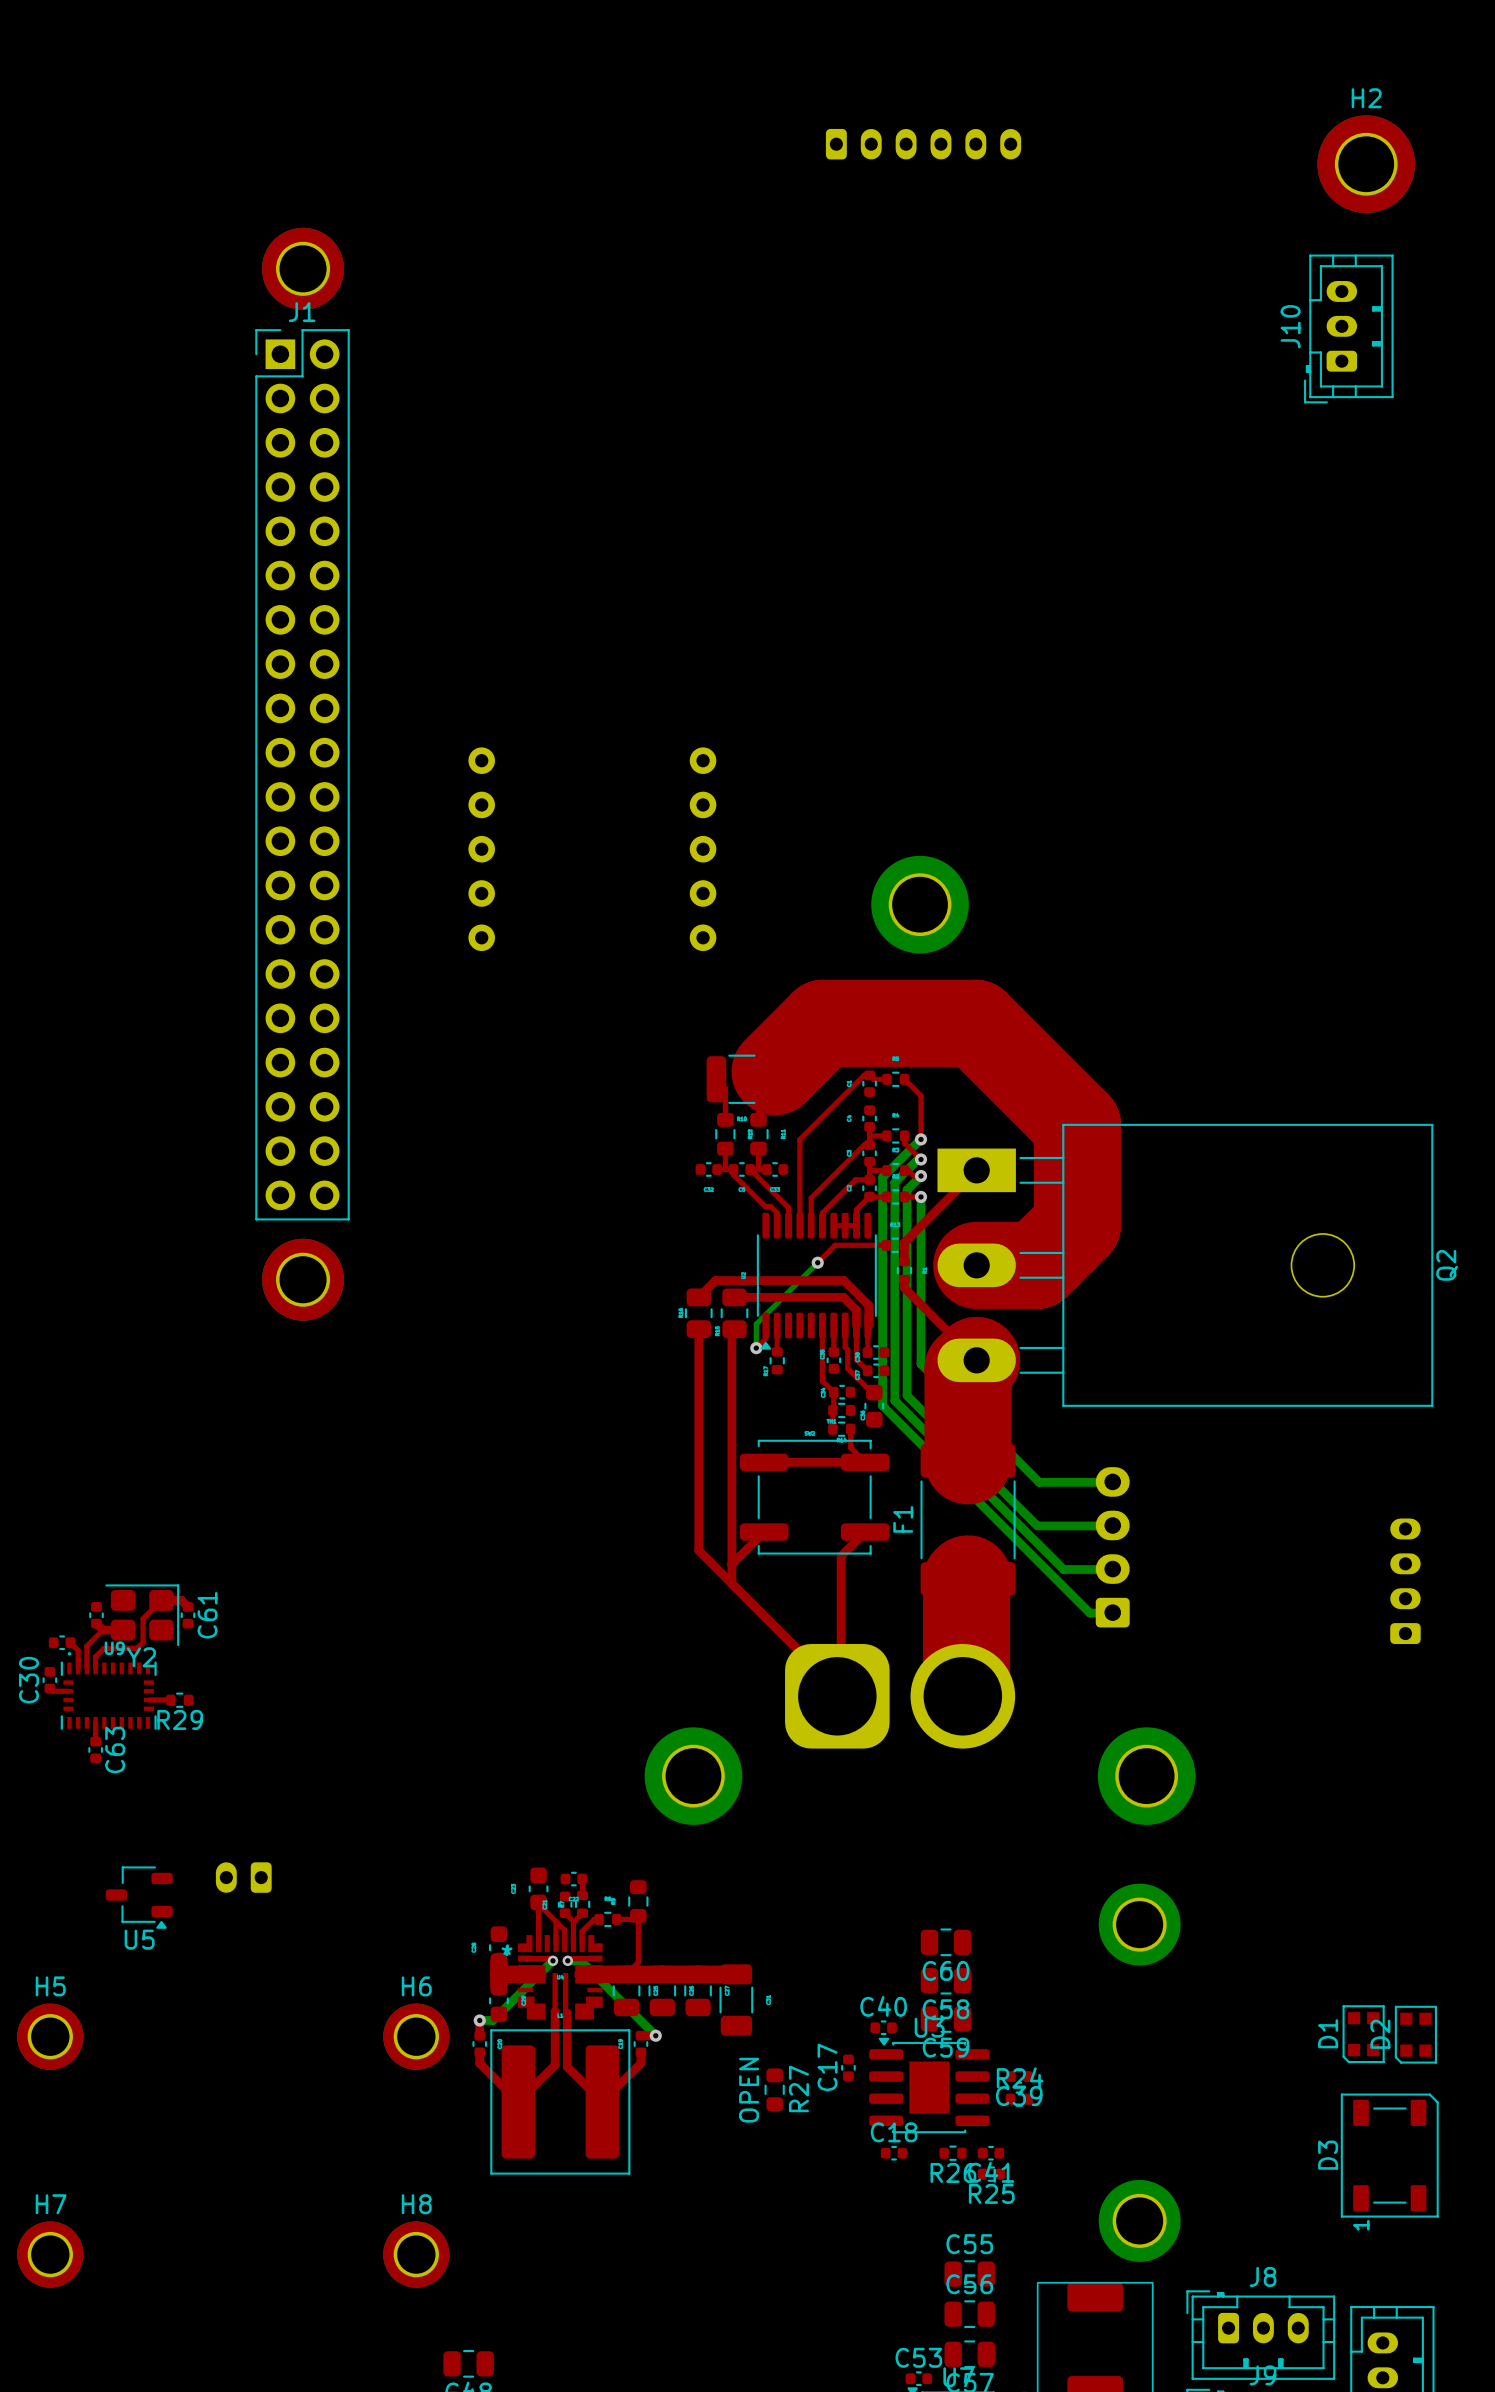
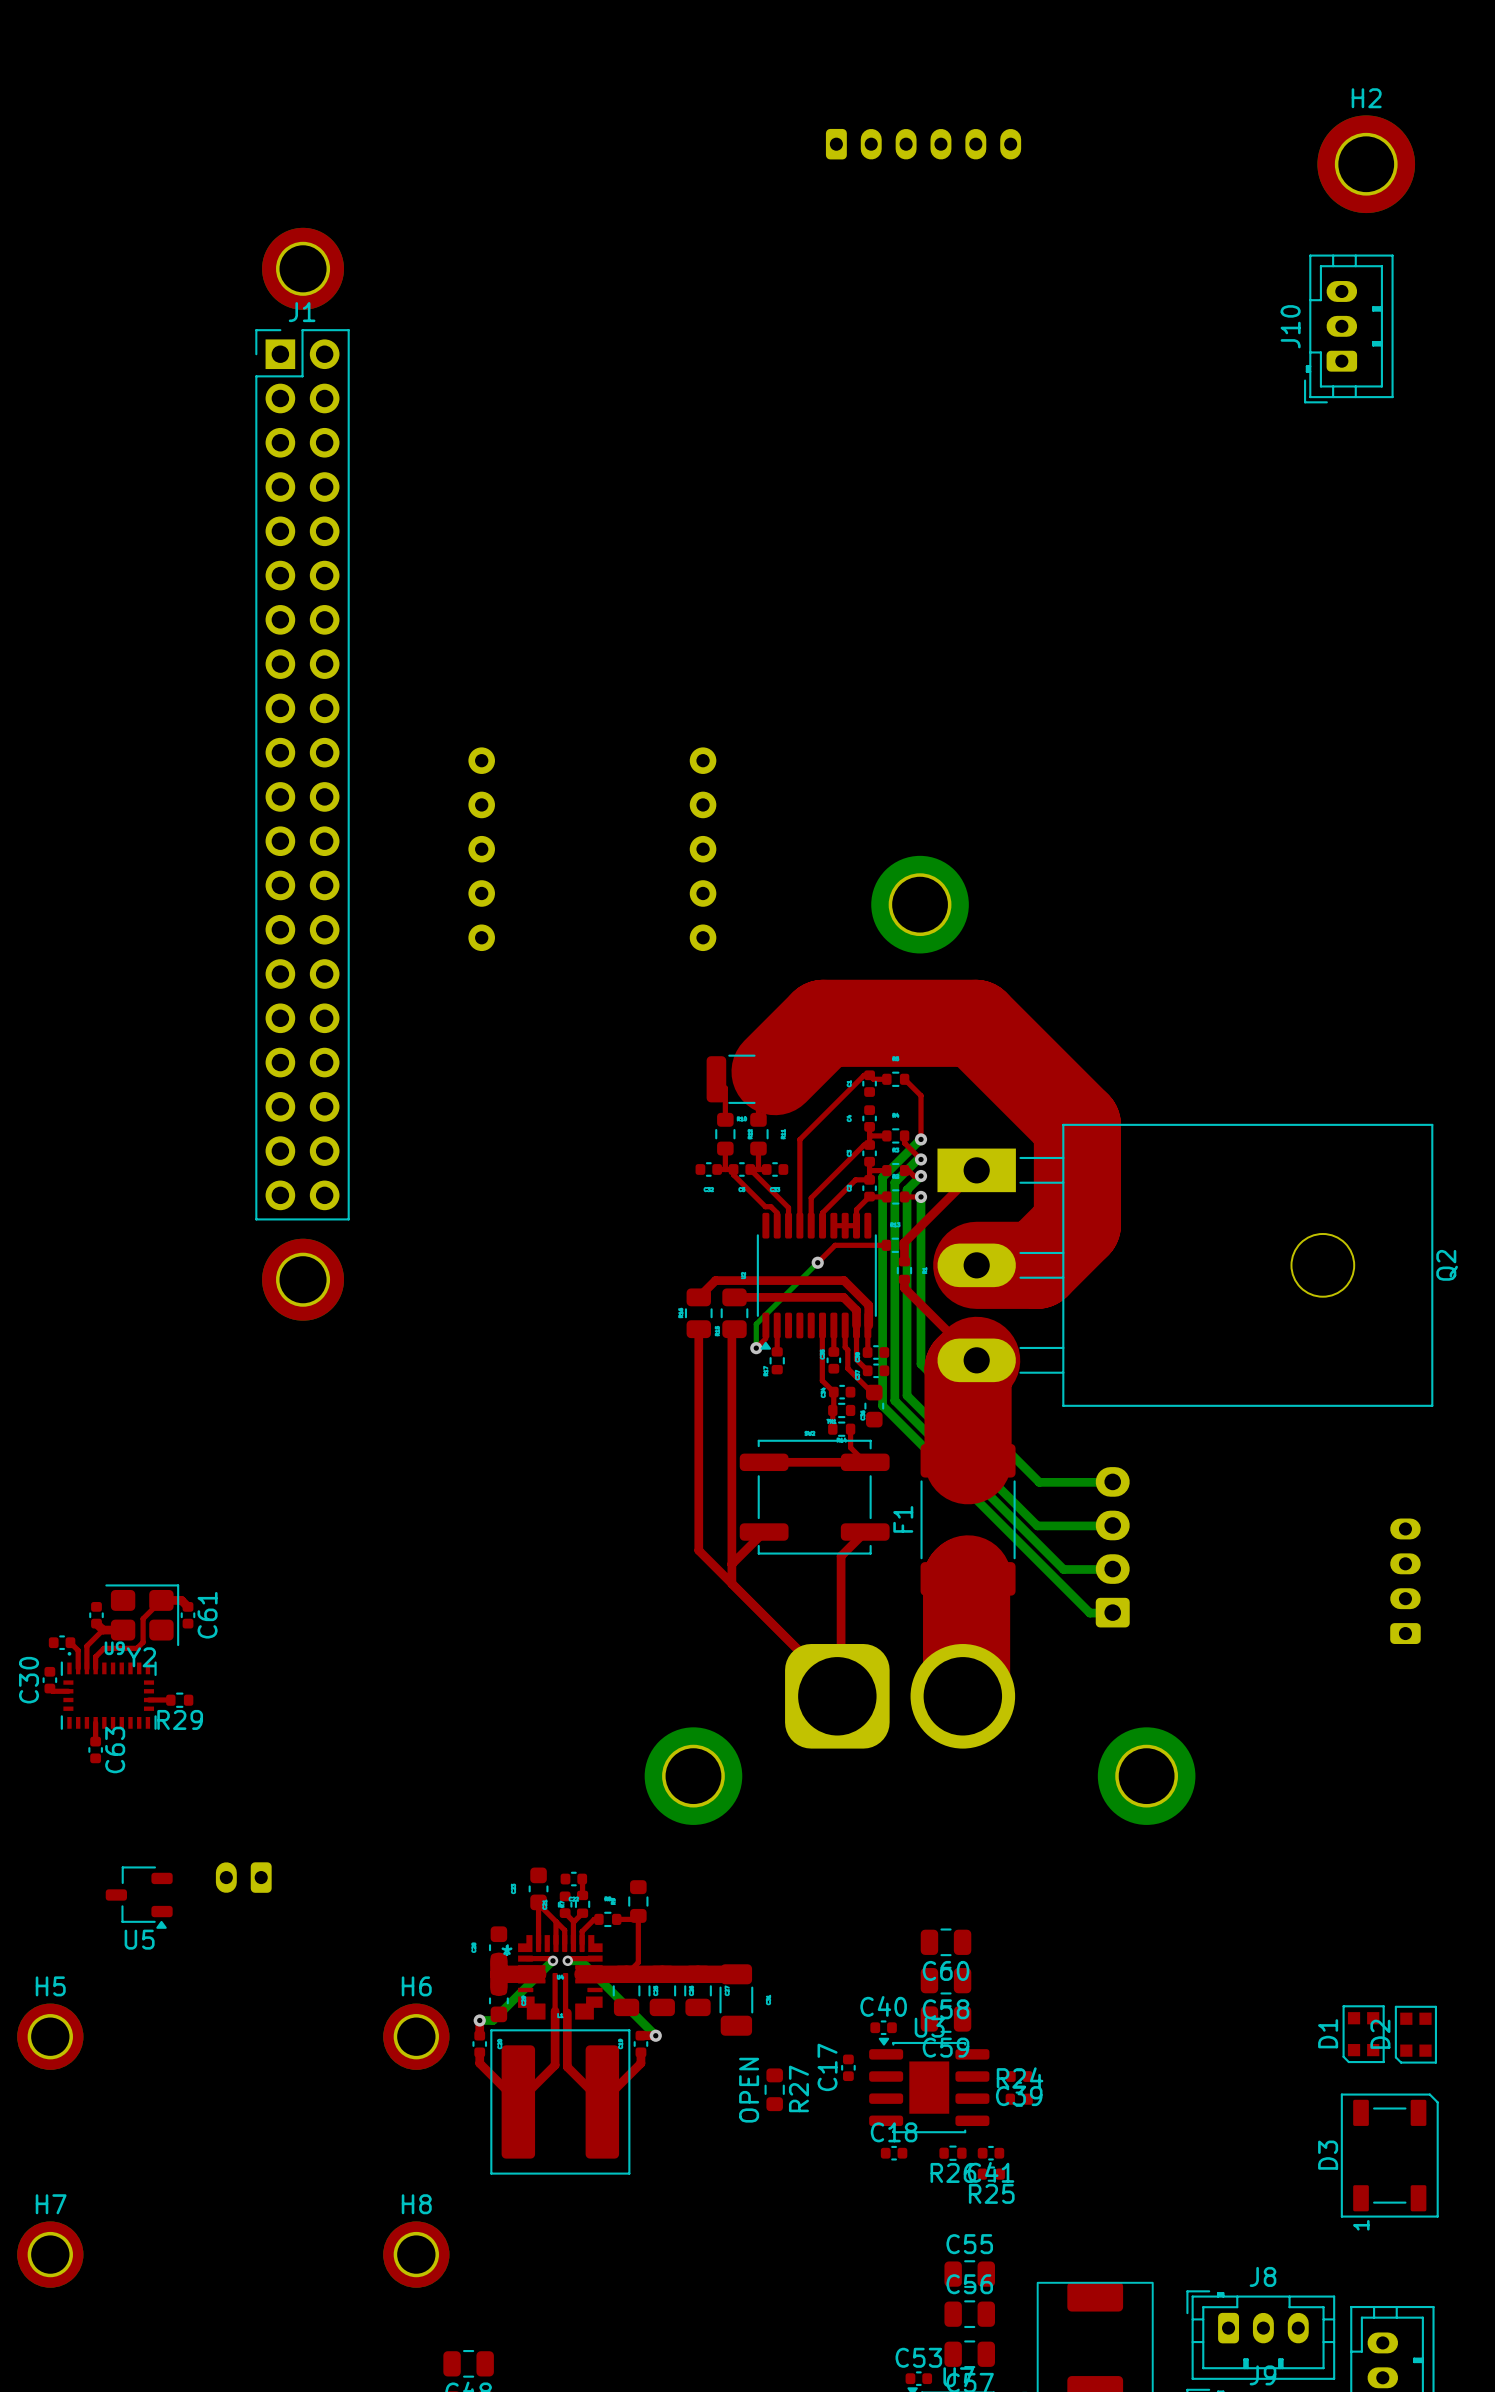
part: (1139, 1924) -> none
part: (1139, 2220) -> none

